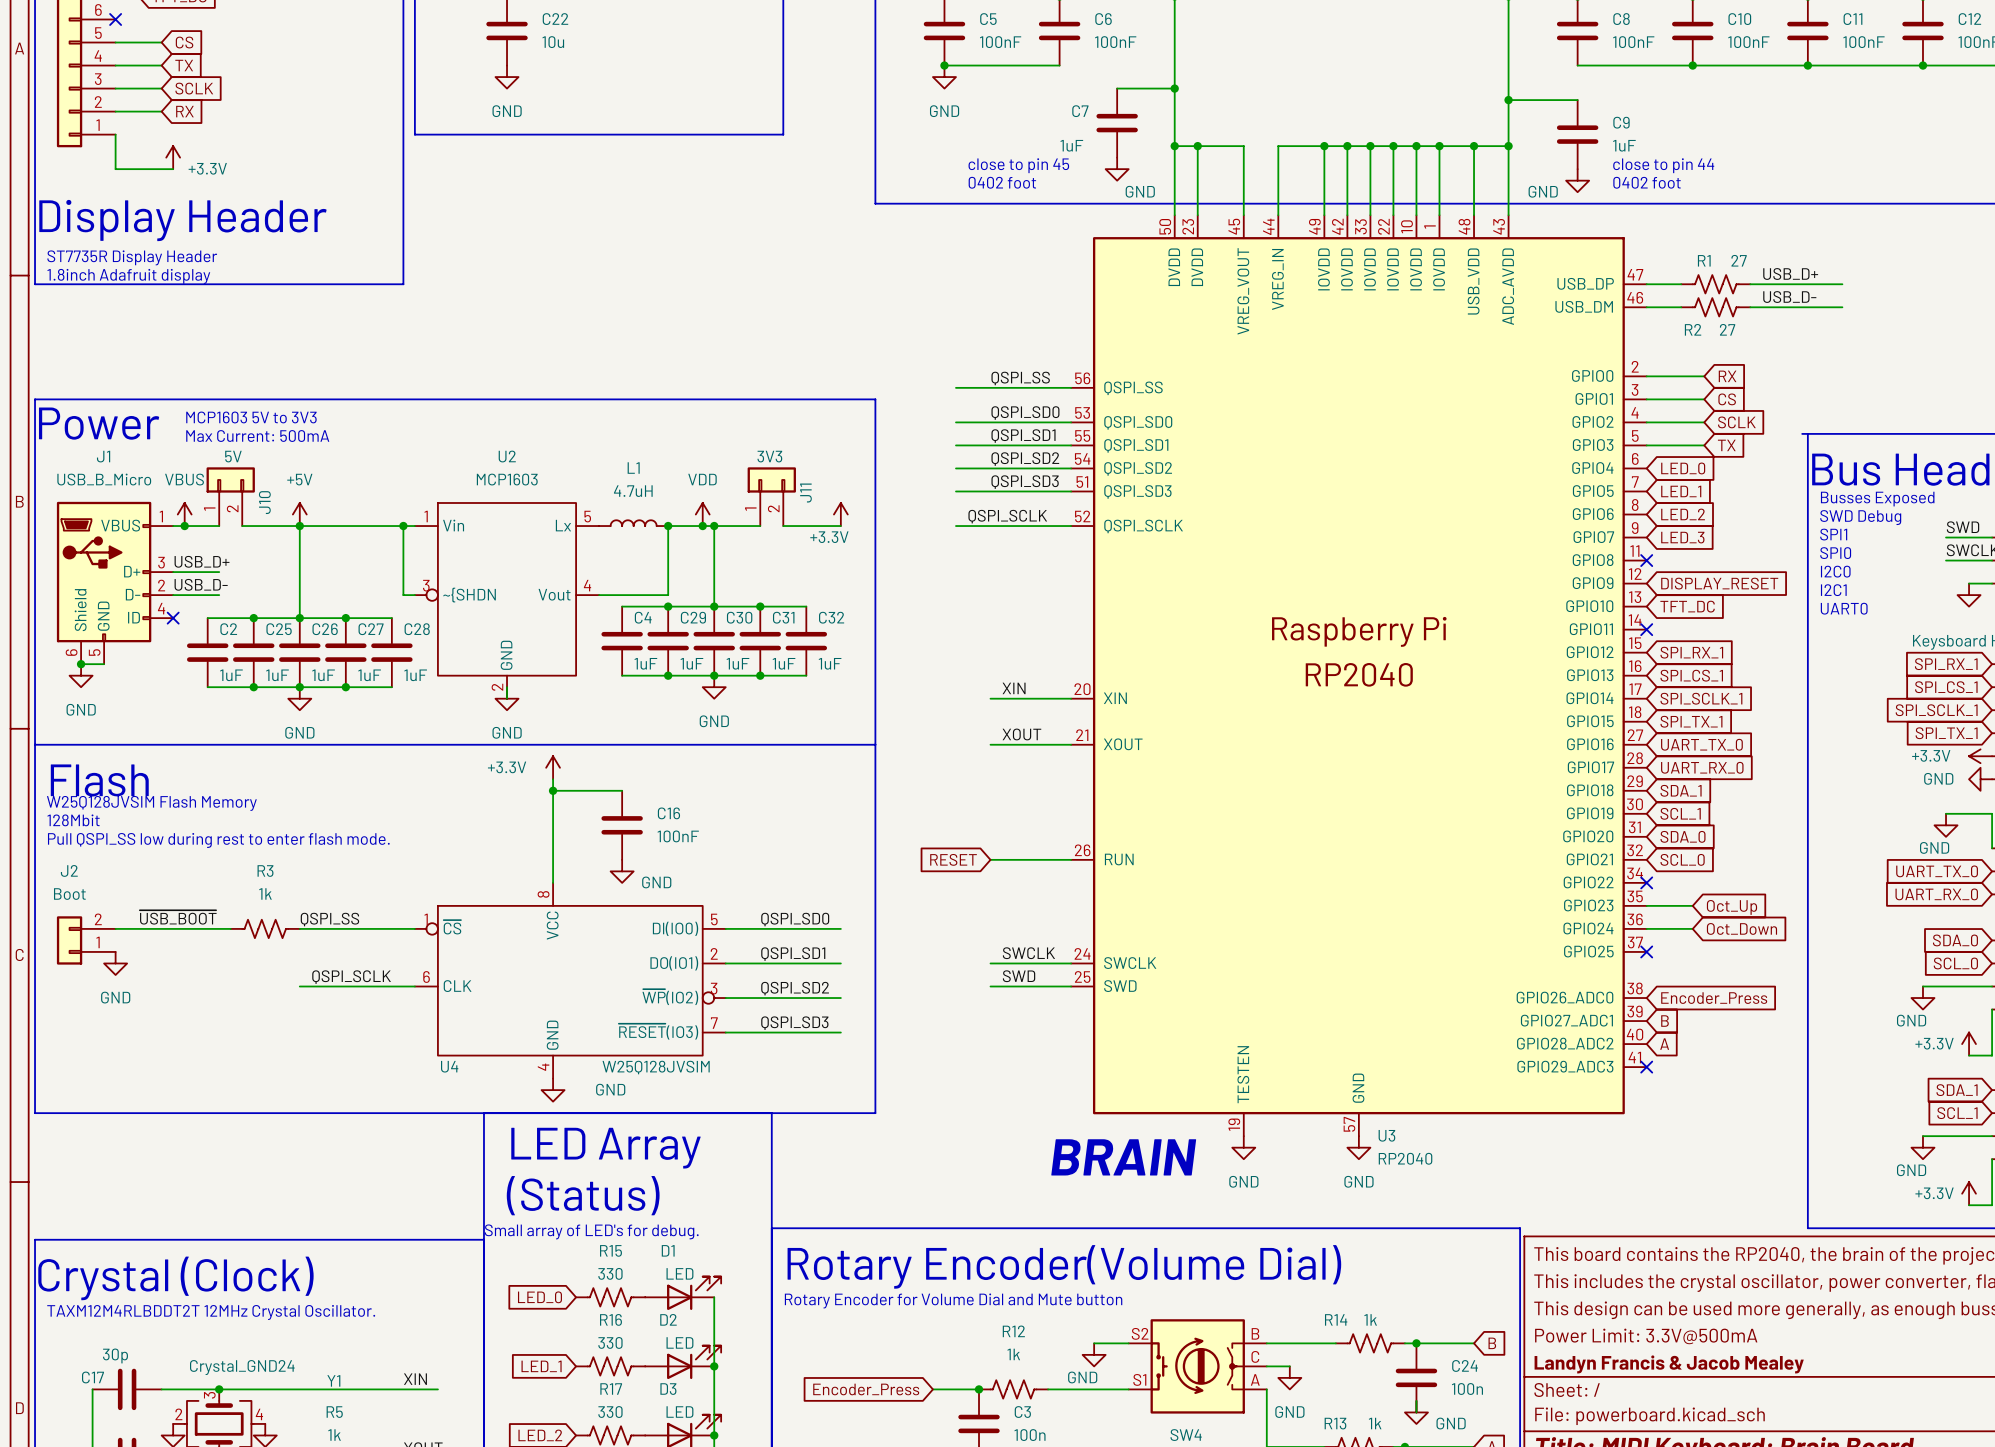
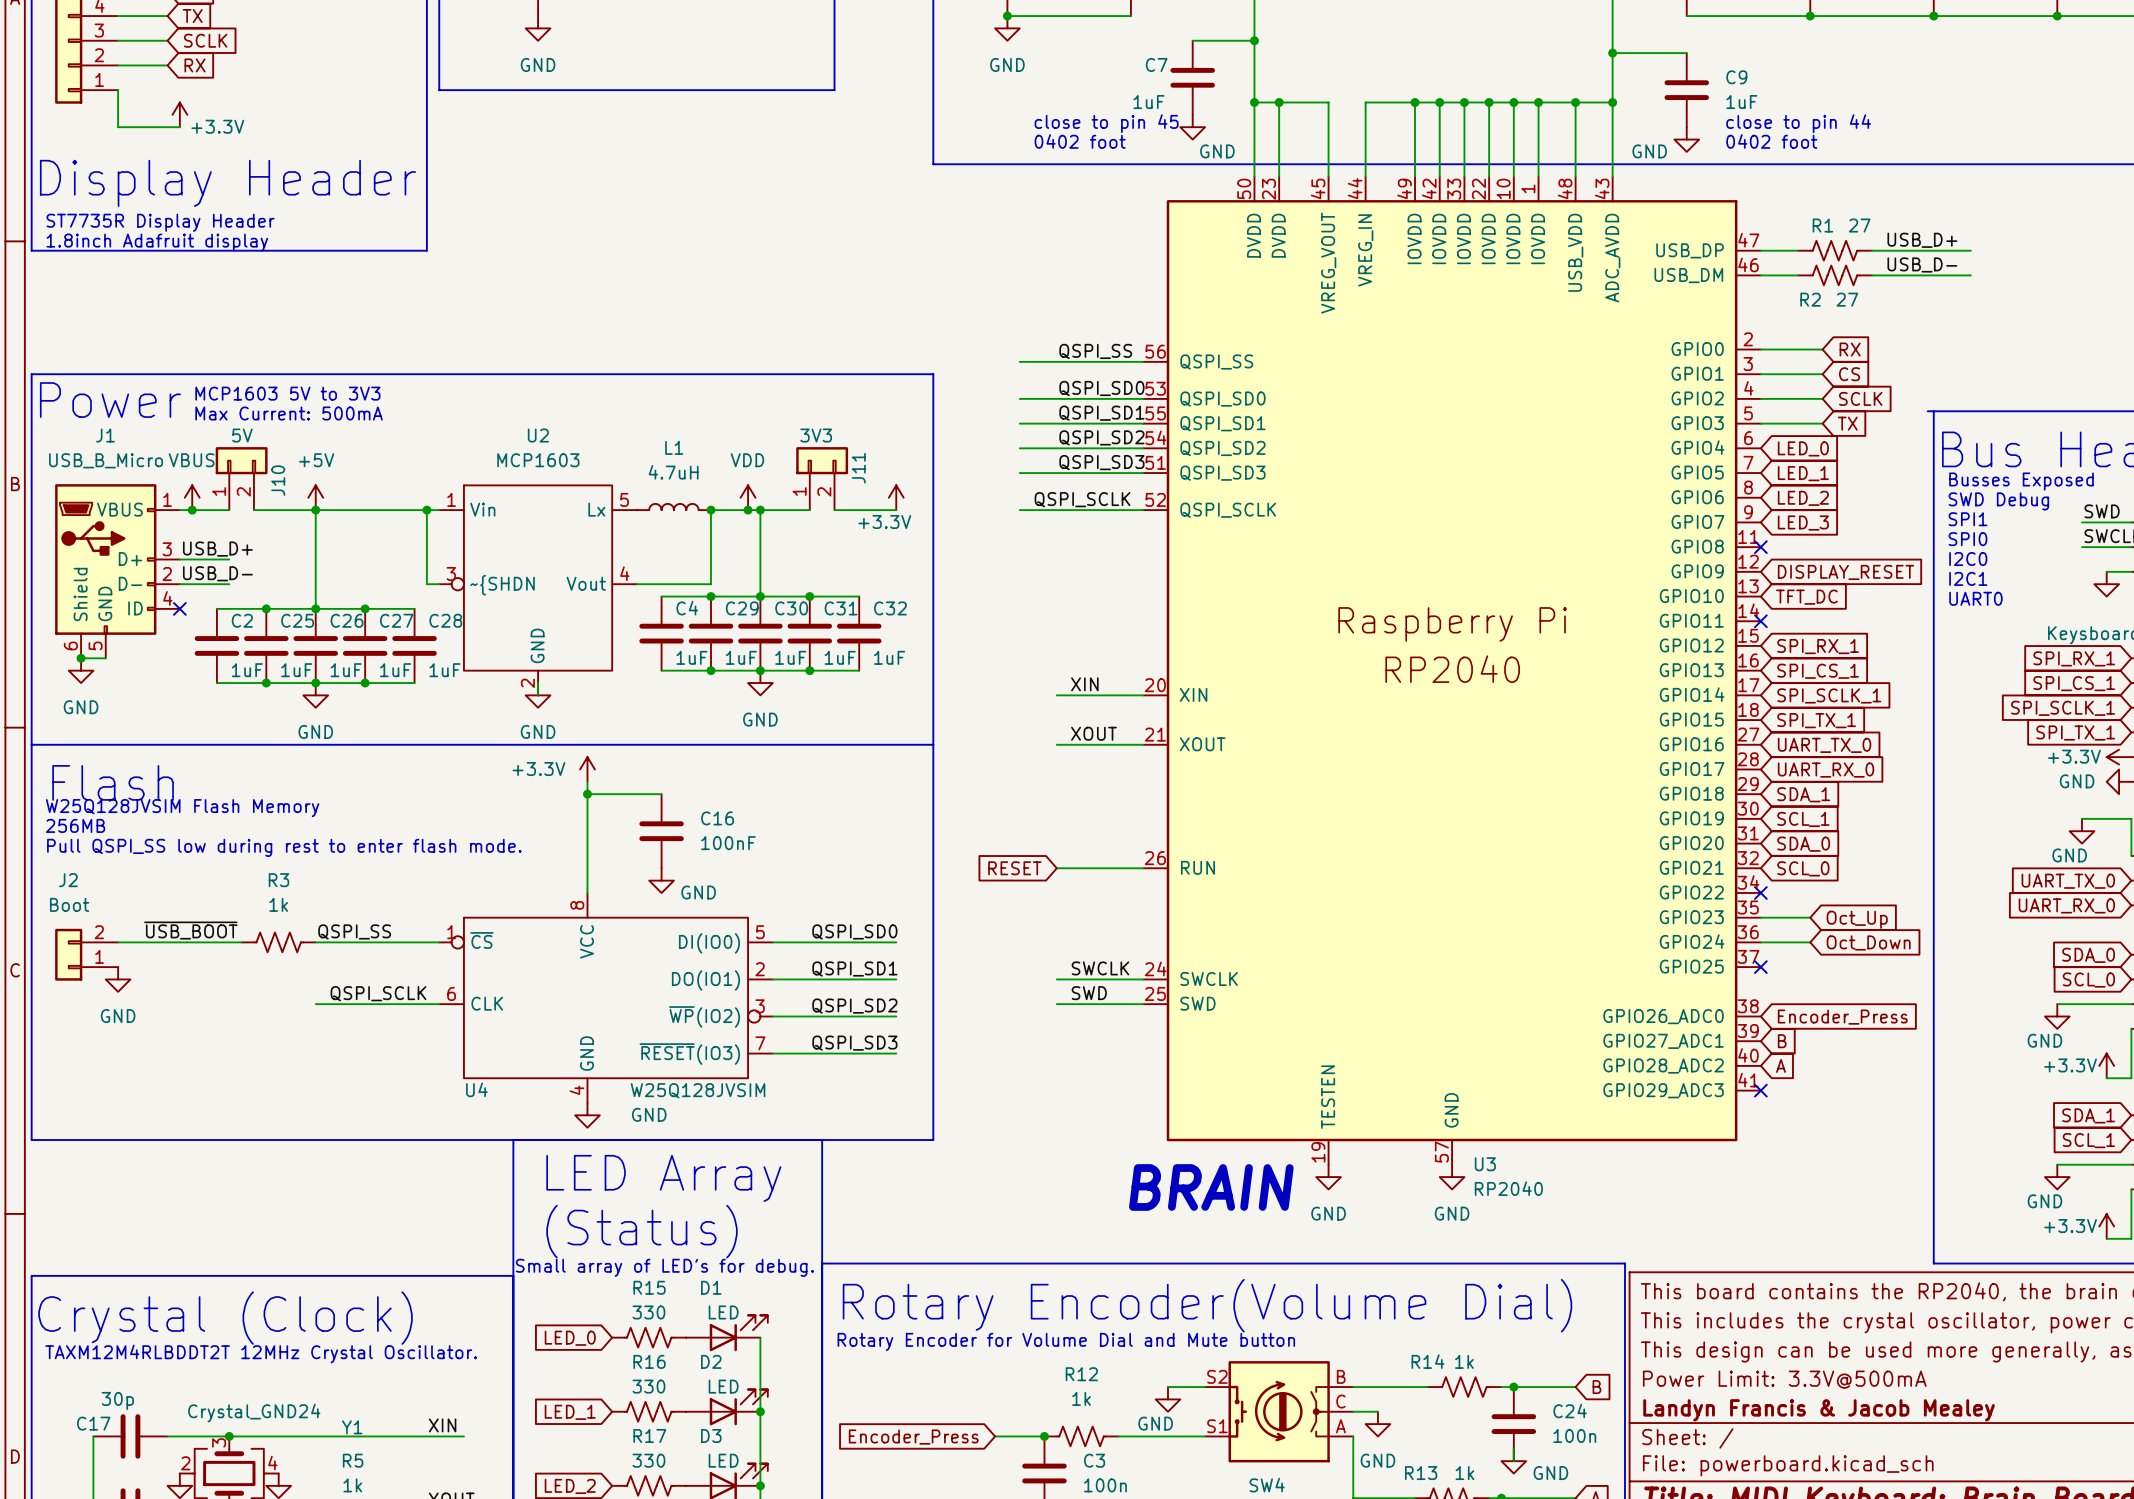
text: 128Mbit (73, 820) -> 256MB (75, 825)

